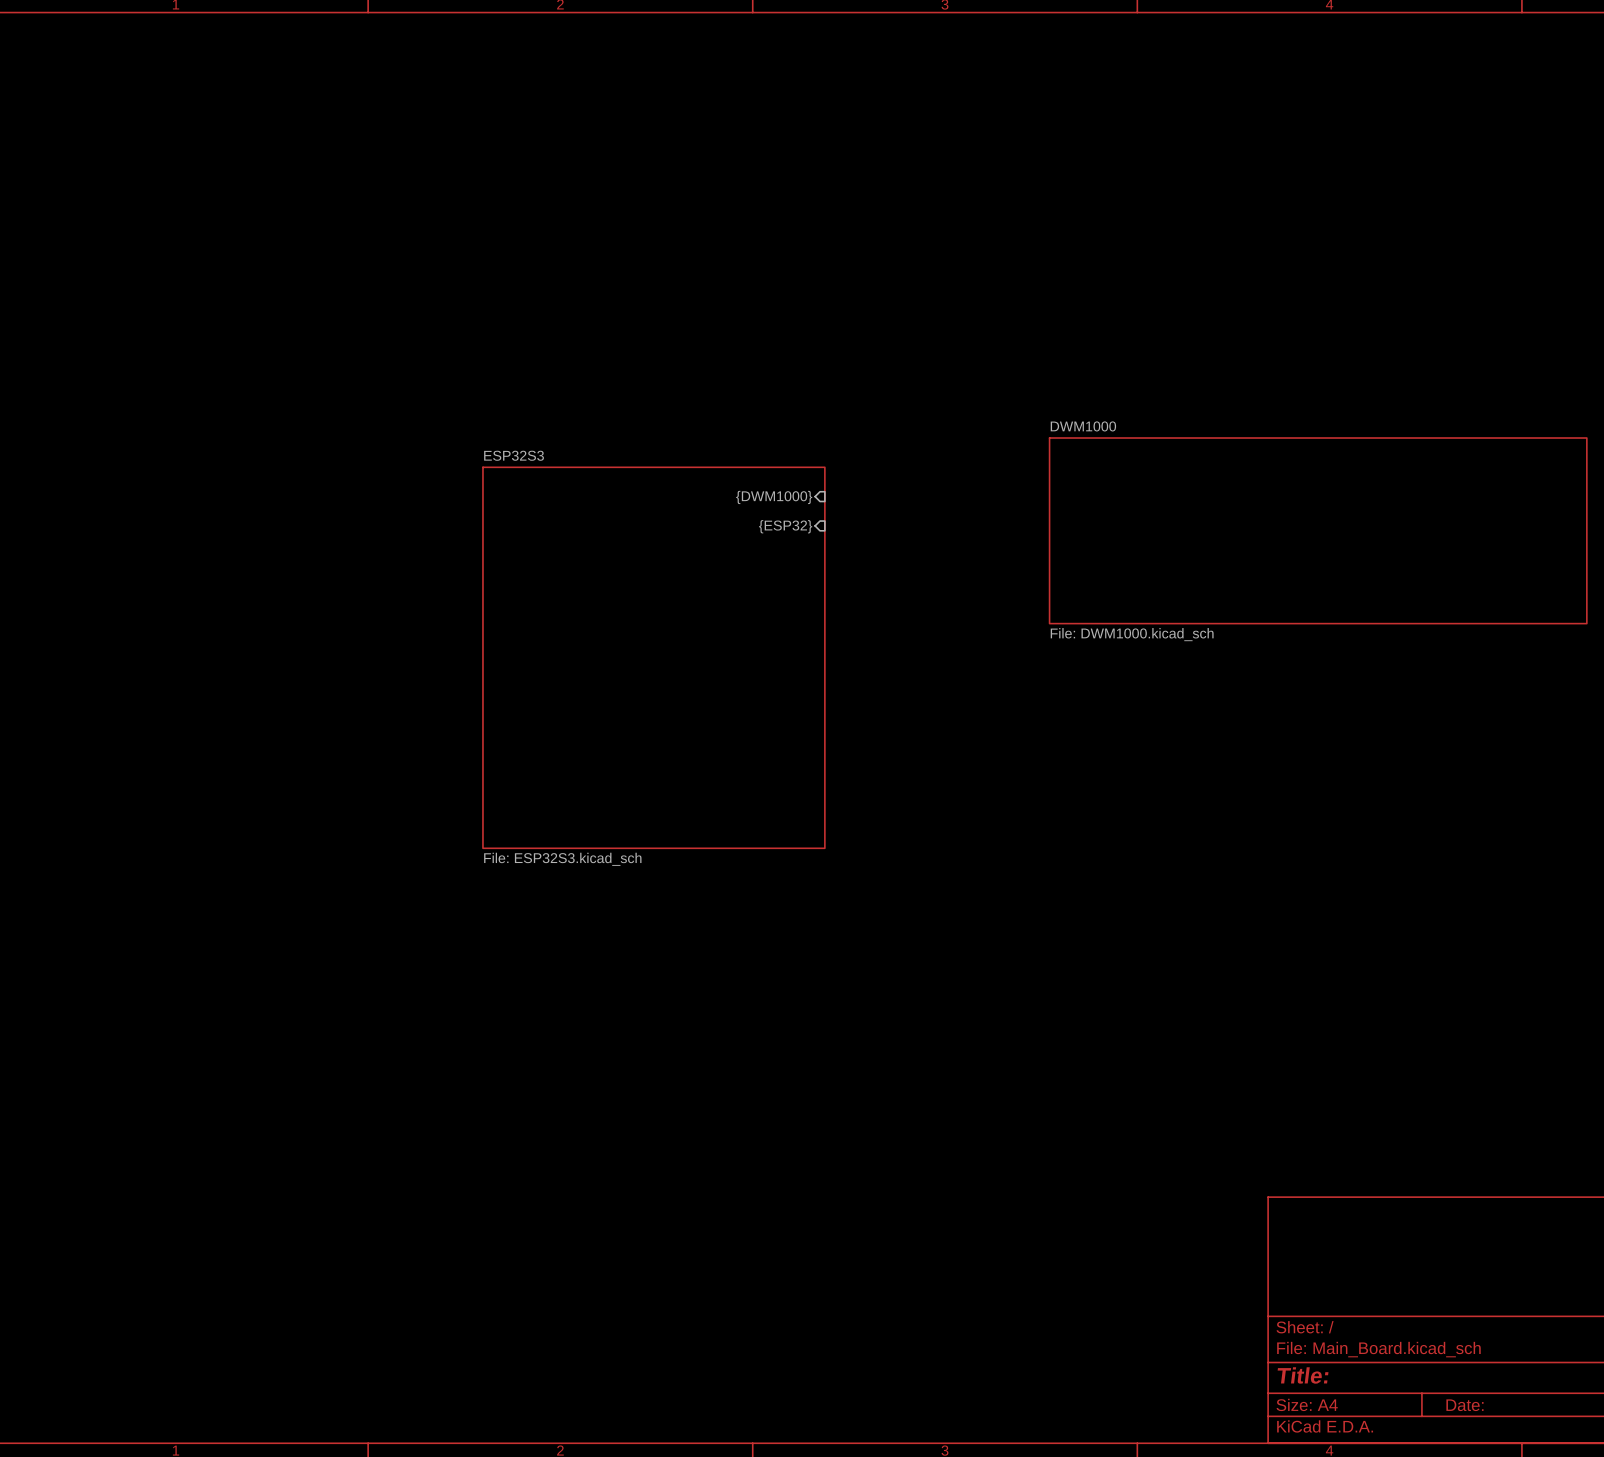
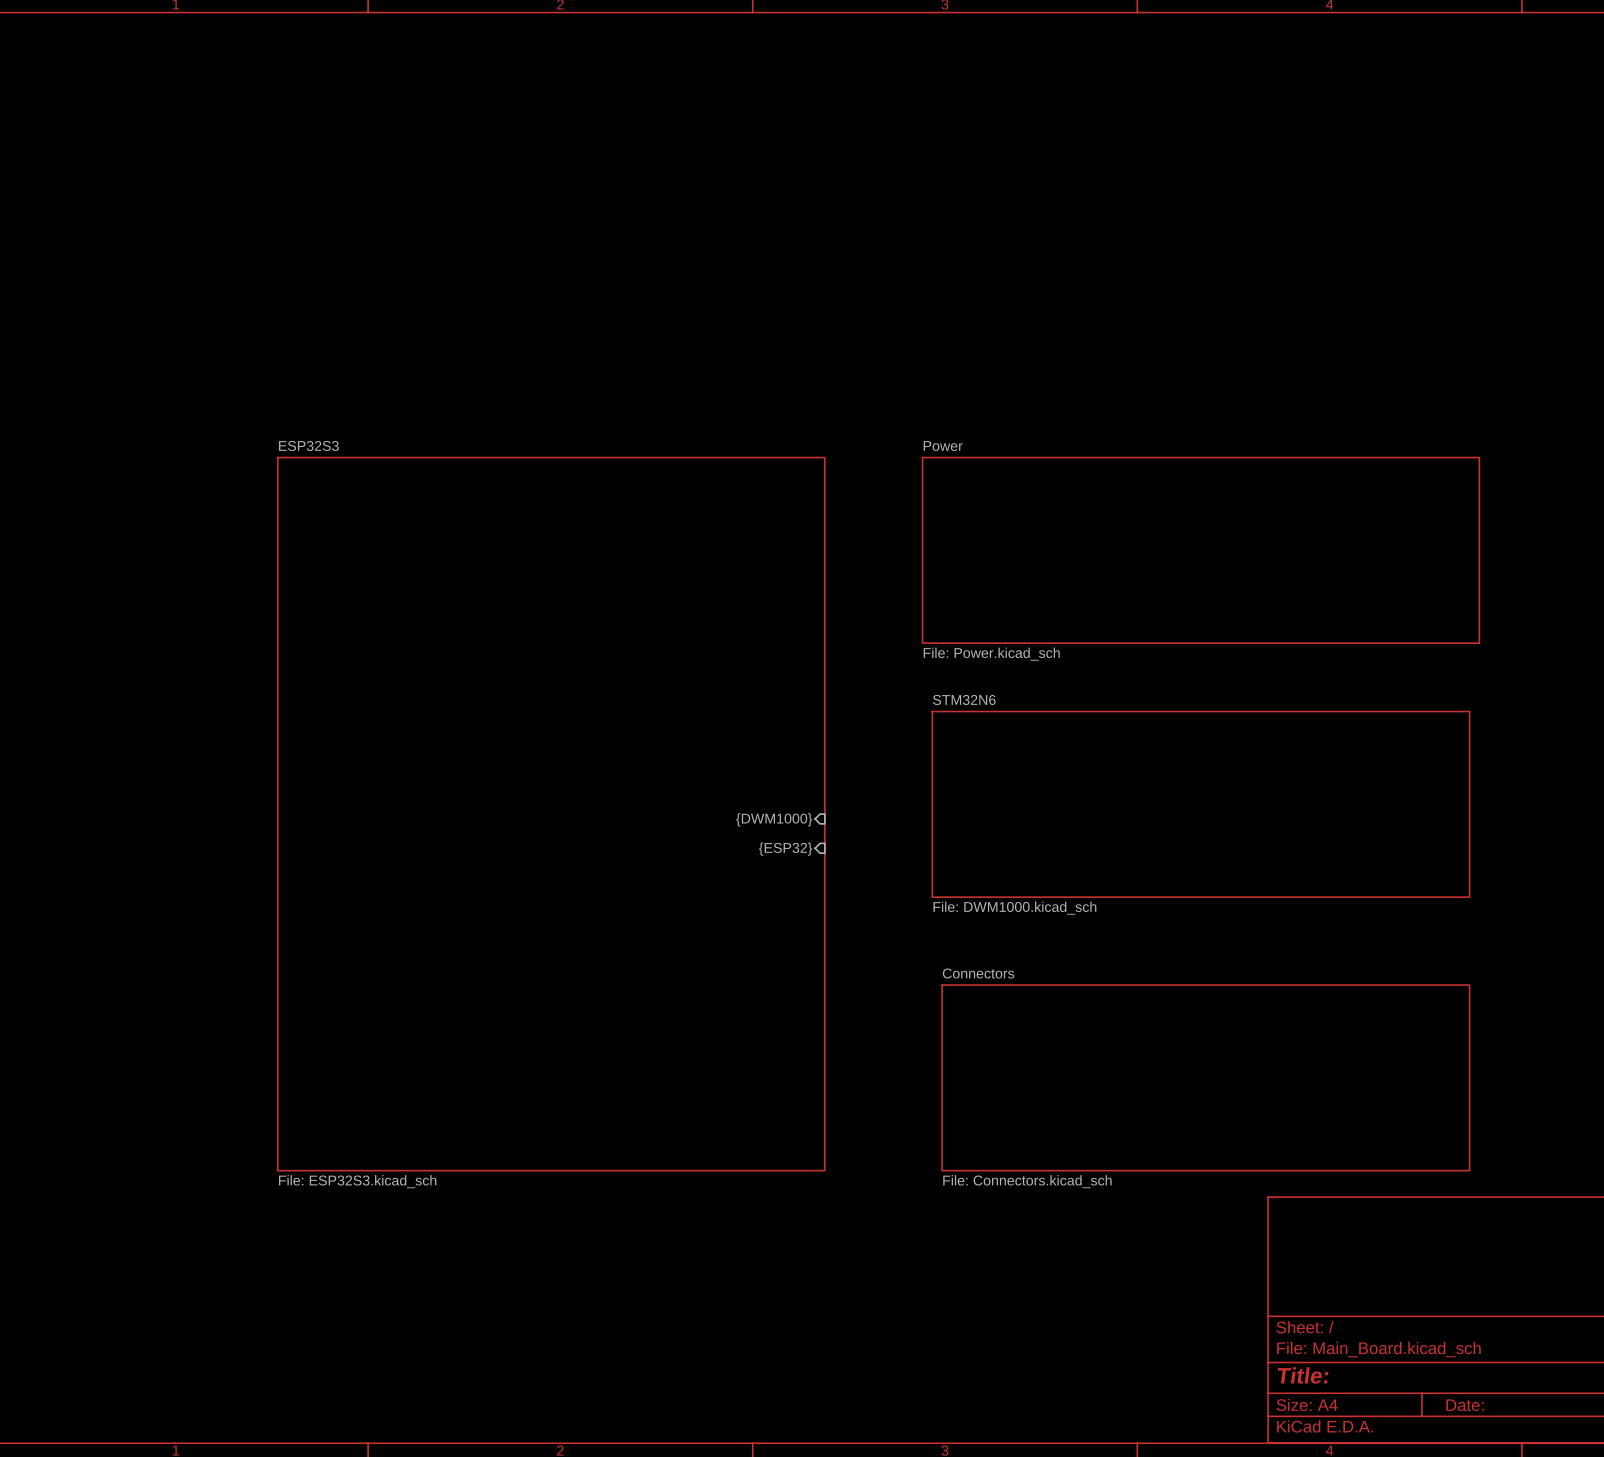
sheet ESP32S3 name position: ESP32S3 (514, 455) -> ESP32S3 (308, 445)
sheet ESP32S3 shape: [482, 466, 826, 849] -> [277, 456, 826, 1172]
sheet pin: {DWM1000} (774, 497) -> none
sheet pin: {ESP32} (785, 526) -> none
sheet DWM1000: File: DWM1000.kicad_sch (1318, 530) -> none
sheet Power: none -> File: Power.kicad_sch (1200, 550)
sheet STM32N6: none -> File: DWM1000.kicad_sch (1200, 804)
sheet pin: none -> {DWM1000} (774, 819)
sheet pin: none -> {ESP32} (785, 849)
sheet ESP32S3 value position: File: ESP32S3.kicad_sch (562, 859) -> File: ESP32S3.kicad_sch (357, 1181)
sheet Connectors: none -> File: Connectors.kicad_sch (1205, 1077)

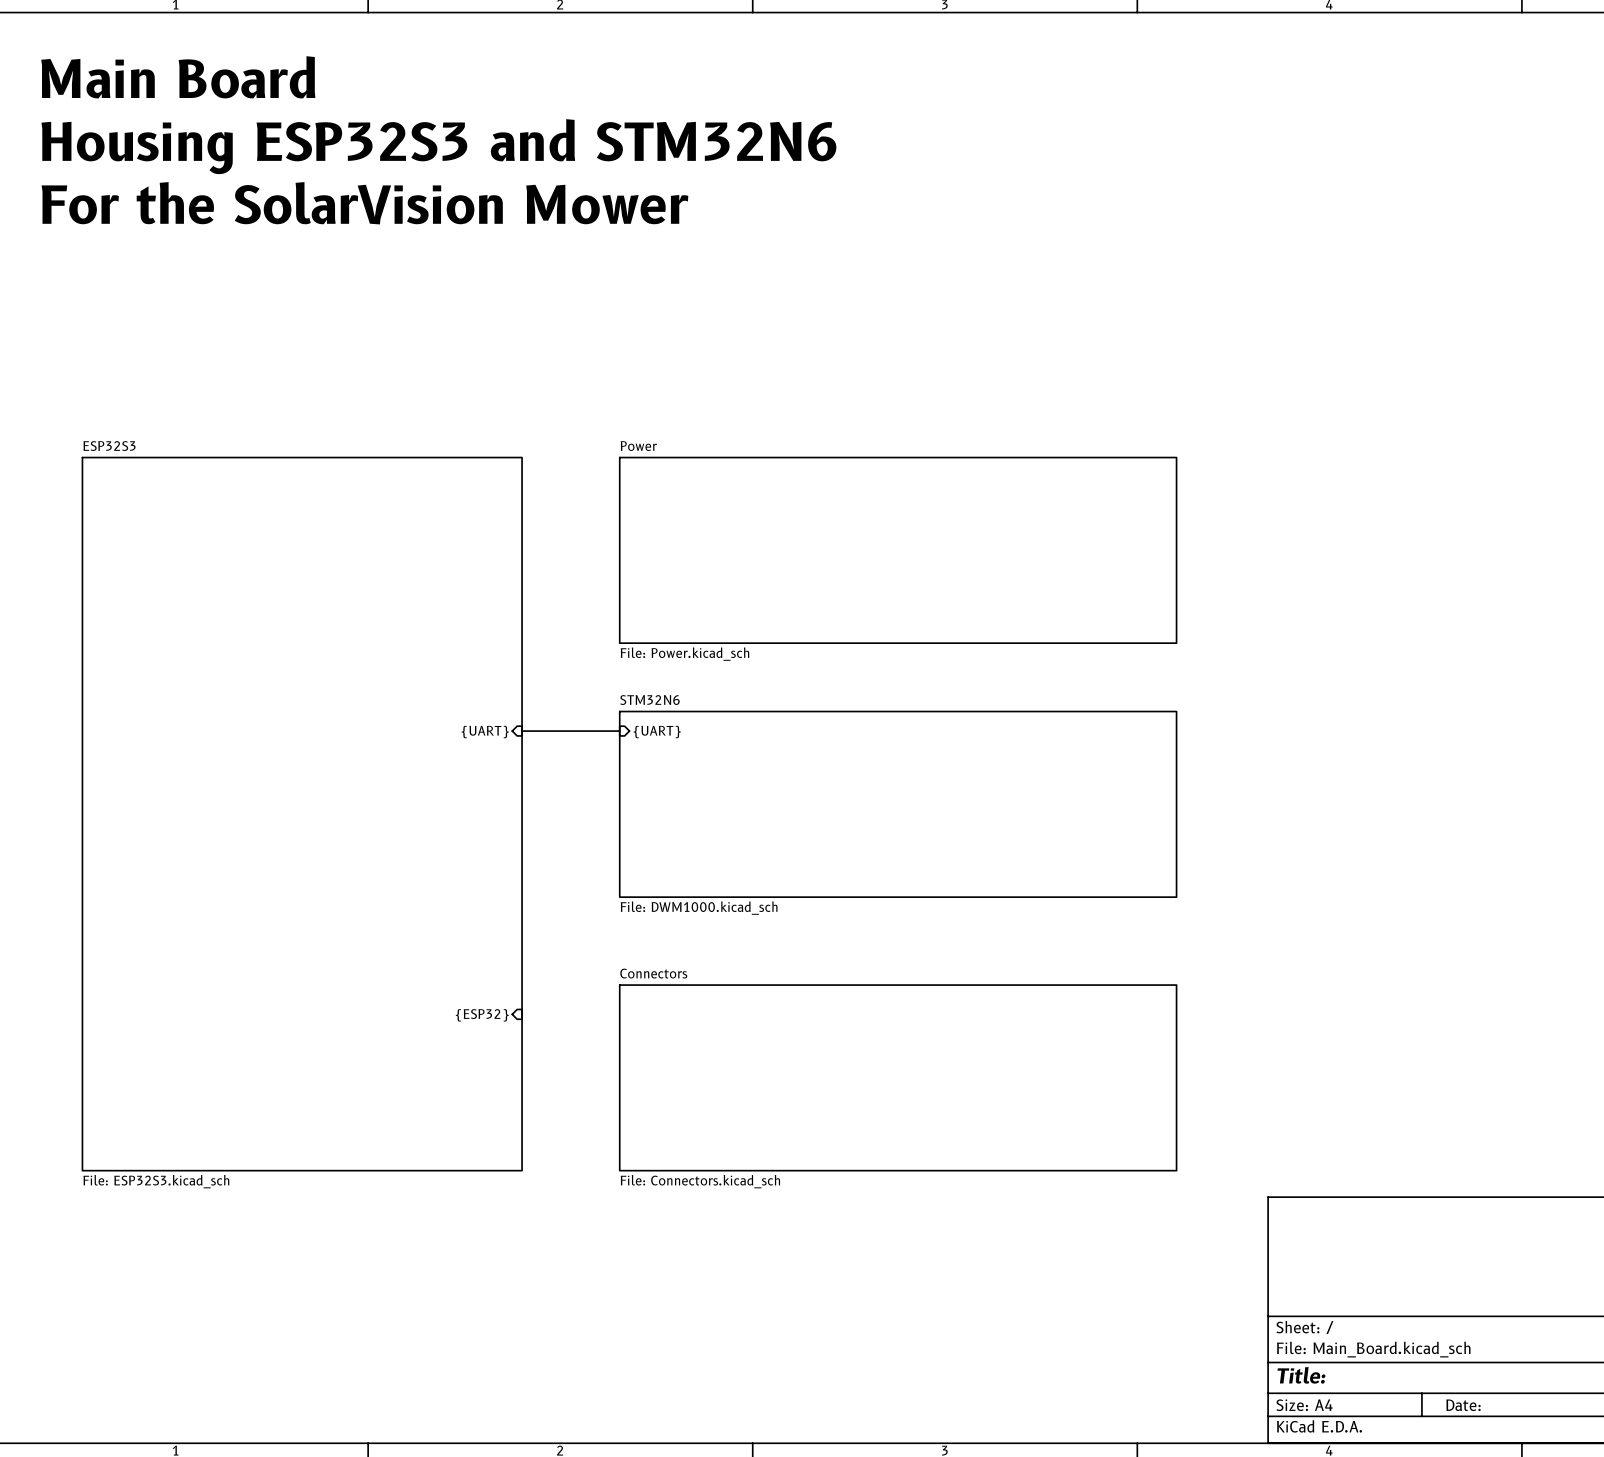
text: none -> Main Board (178, 77)
text: none -> Housing ESP32S3 and STM32N6 (438, 146)
text: none -> For the SolarVision Mower (364, 203)
sheet ESP32S3 name position: ESP32S3 (308, 445) -> ESP32S3 (109, 446)
sheet ESP32S3 shape: [277, 456, 826, 1172] -> [81, 456, 523, 1172]
sheet Power: none -> File: Power.kicad_sch (898, 550)
sheet Power: File: Power.kicad_sch (1200, 550) -> none
sheet STM32N6 shape: [931, 710, 1471, 898] -> [619, 710, 1178, 898]
sheet pin: none -> {UART} (485, 732)
bus: none -> (522, 731) (619, 731)
sheet pin: none -> {UART} (657, 732)
sheet pin: {DWM1000} (774, 819) -> none
sheet pin: {ESP32} (785, 849) -> none
sheet pin: none -> {ESP32} (482, 1015)
sheet Connectors: none -> File: Connectors.kicad_sch (898, 1077)
sheet Connectors: File: Connectors.kicad_sch (1205, 1077) -> none
sheet ESP32S3 value position: File: ESP32S3.kicad_sch (357, 1181) -> File: ESP32S3.kicad_sch (156, 1181)

